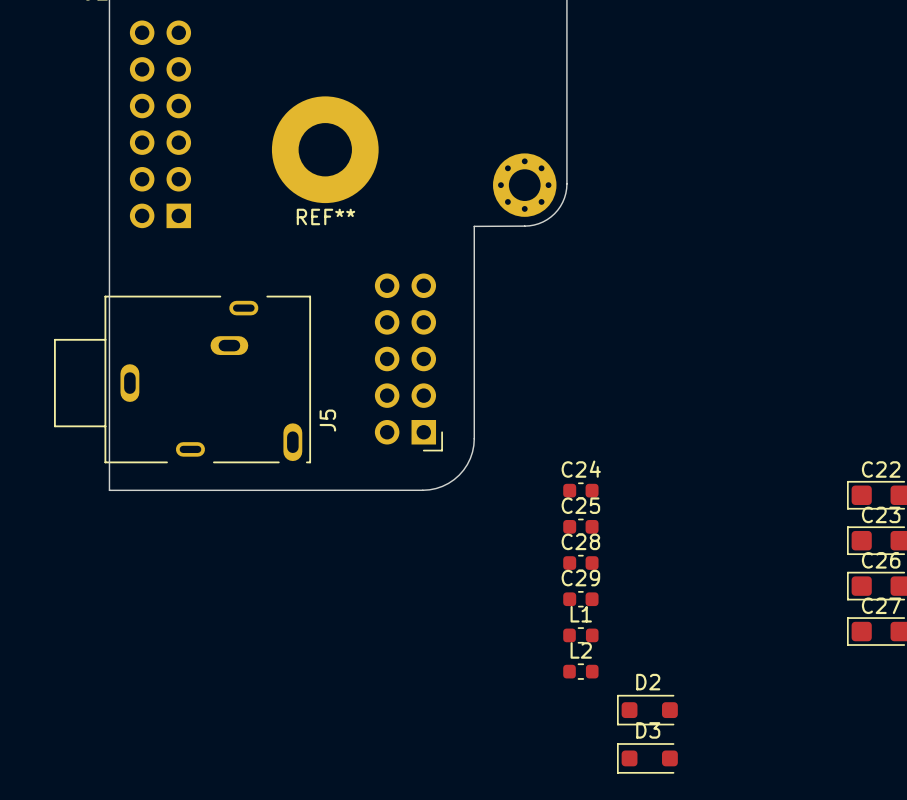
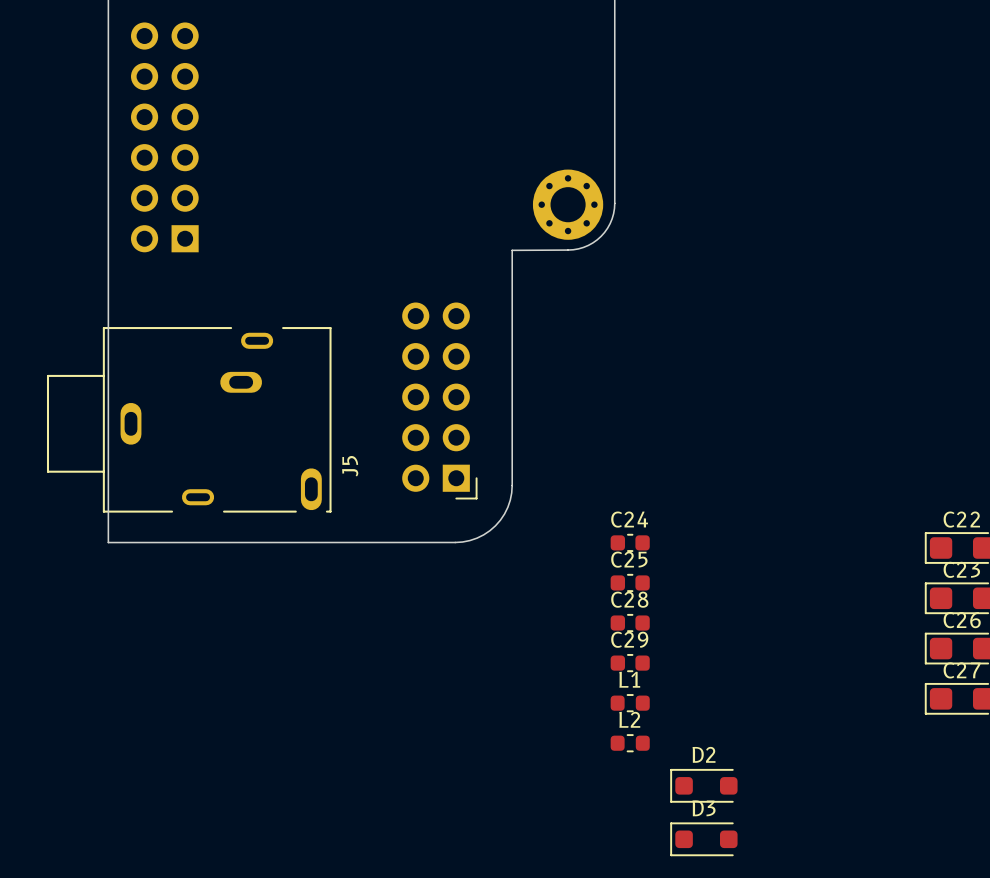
REF**: (325, 149) -> none

